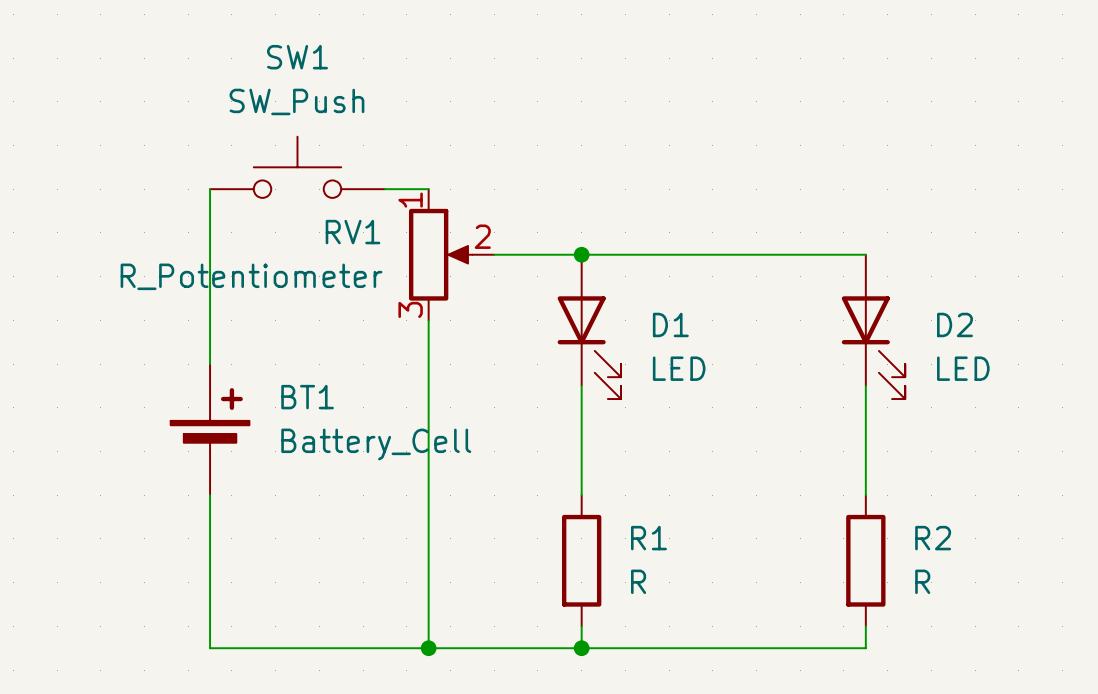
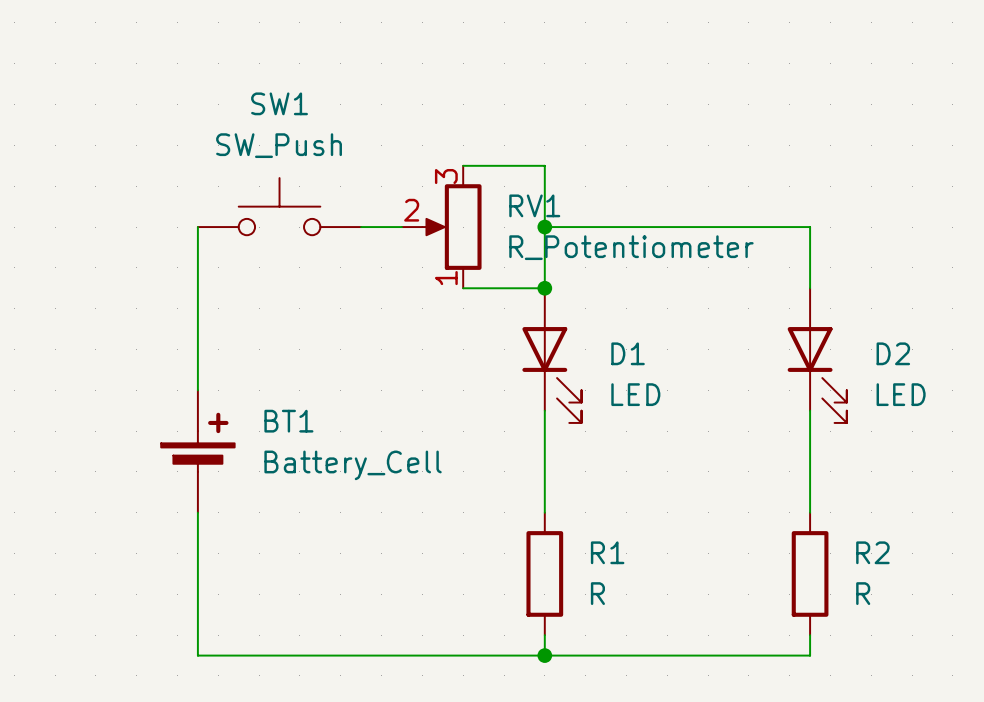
wire: none -> (463, 165) (544, 165) (544, 288)
junction: none -> (544, 227)
RV1 name position: RV1 (353, 232) -> RV1 (534, 205)
RV1 rotation: 0° (440, 254) -> 180° (451, 227)
wire: (581, 254) (865, 254) -> (544, 227) (810, 227) (810, 288)
RV1 value position: R_Potentiometer (251, 276) -> R_Potentiometer (631, 247)
wire: (428, 320) (428, 648) -> none
junction: (428, 648) -> none

